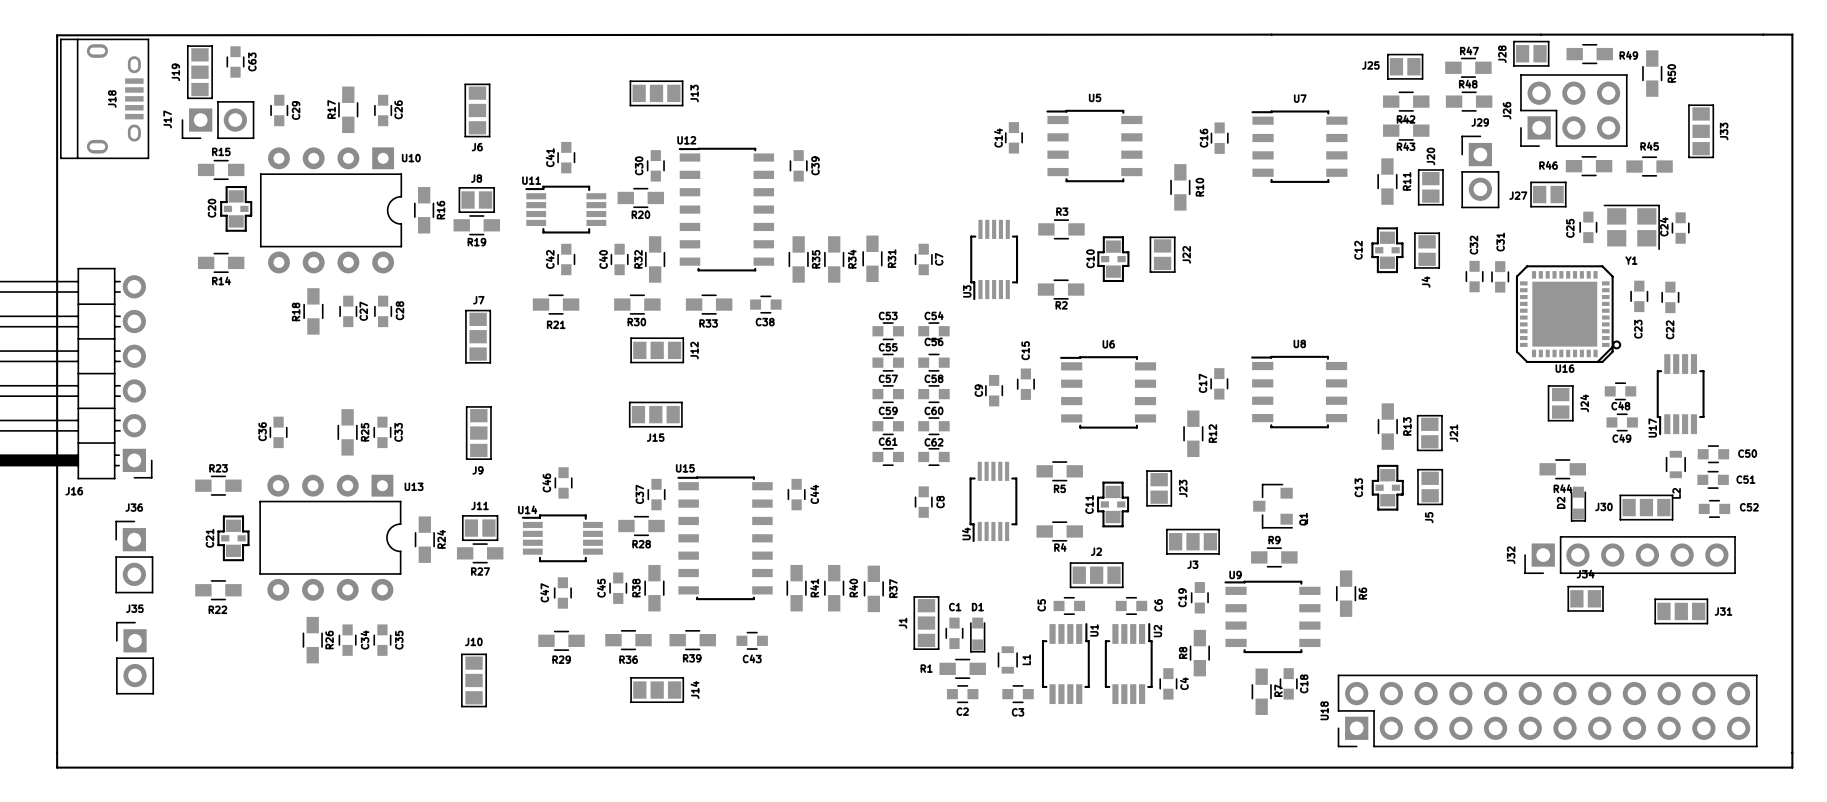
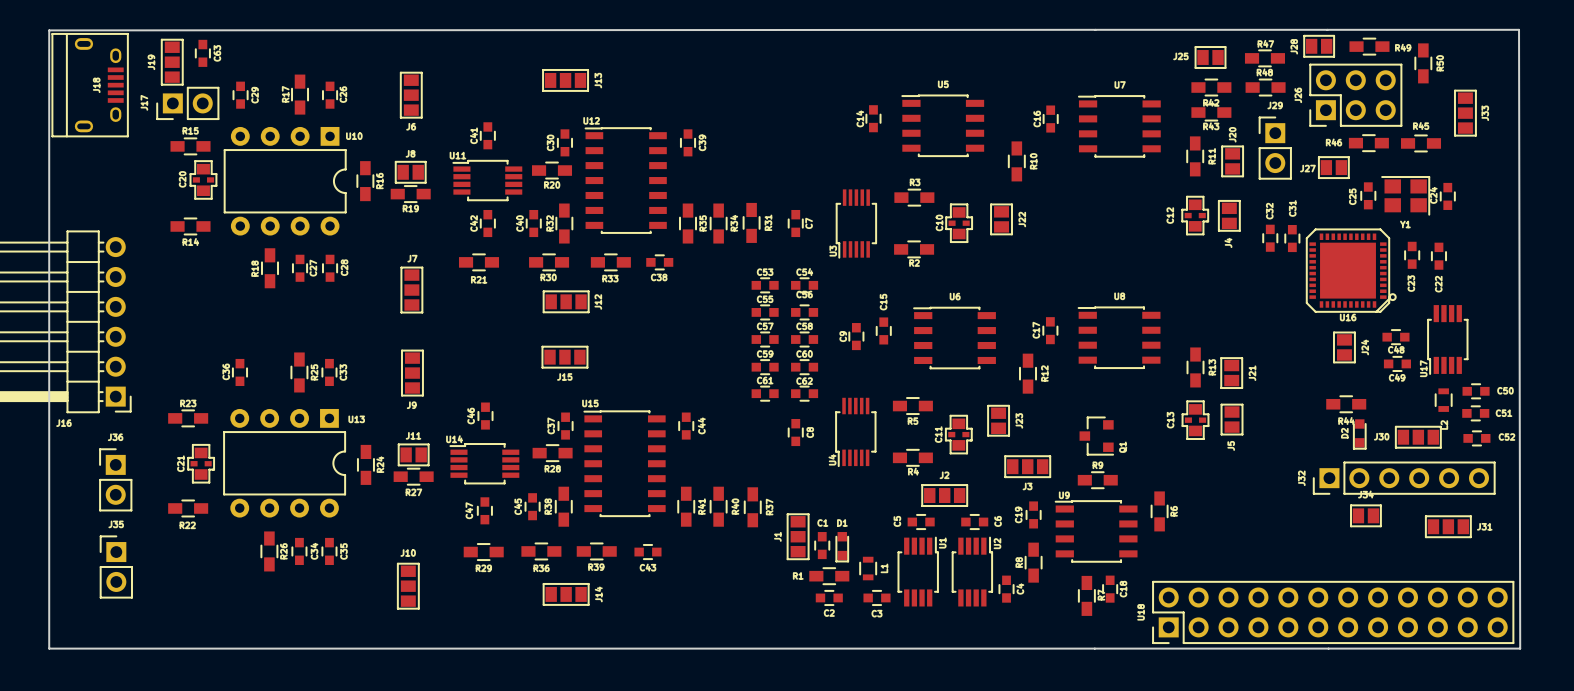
board edge: (1763, 34) (1792, 34) (1792, 767) (57, 767) (57, 752) -> (1519, 29) (1520, 648) (49, 648)

